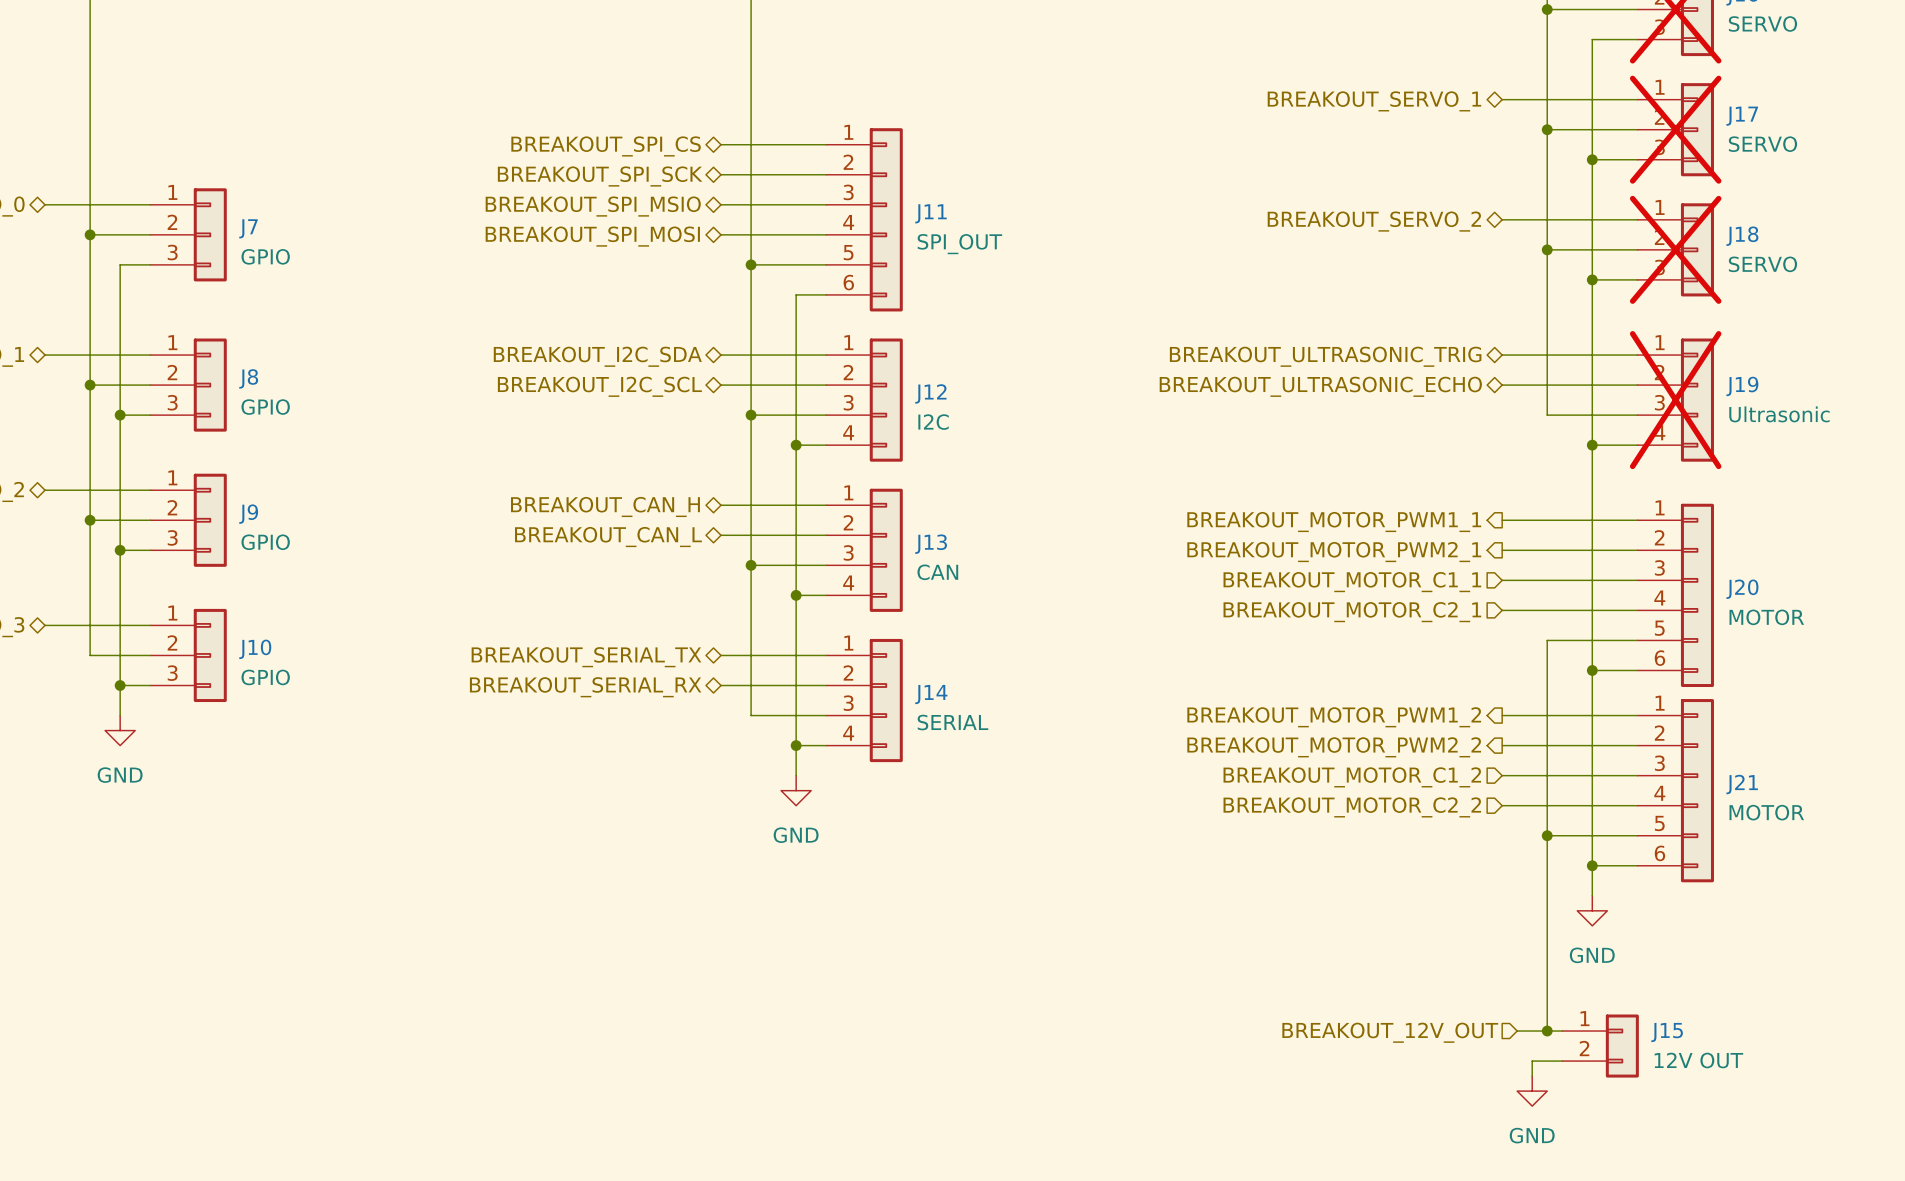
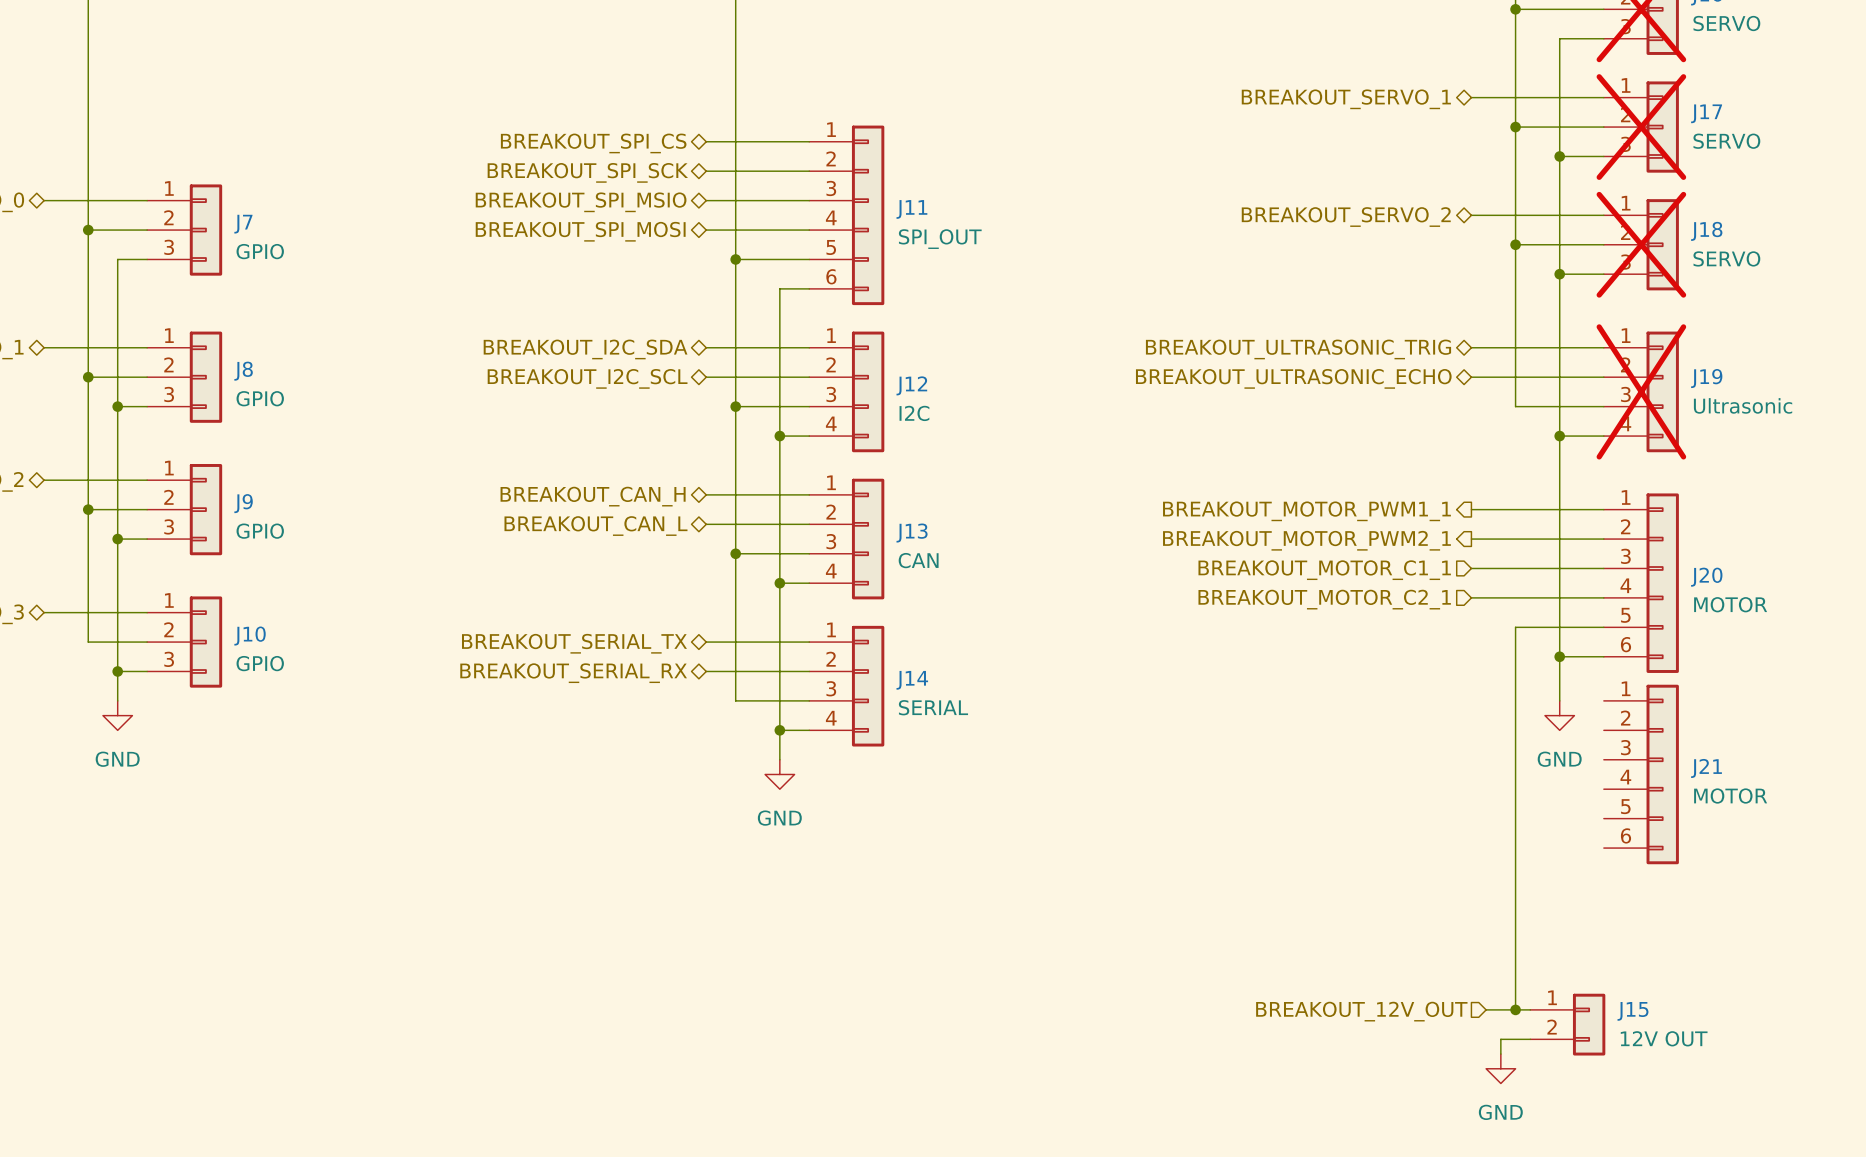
wire: (1502, 715) (1637, 715) -> none
wire: (1592, 715) (1592, 895) -> none
hierarchical label: BREAKOUT_MOTOR_PWM1_2 (1334, 717) -> none
wire: (1502, 745) (1637, 745) -> none
hierarchical label: BREAKOUT_MOTOR_PWM2_2 (1334, 747) -> none
wire: (1502, 775) (1637, 775) -> none
hierarchical label: BREAKOUT_MOTOR_C1_2 (1352, 777) -> none
wire: (1502, 805) (1637, 805) -> none
hierarchical label: BREAKOUT_MOTOR_C2_2 (1352, 807) -> none
wire: (1547, 835) (1637, 835) -> none
junction: (1547, 835) -> none
wire: (1592, 865) (1637, 865) -> none
junction: (1592, 865) -> none
power symbol position: GND (1592, 910) -> GND (1559, 715)

